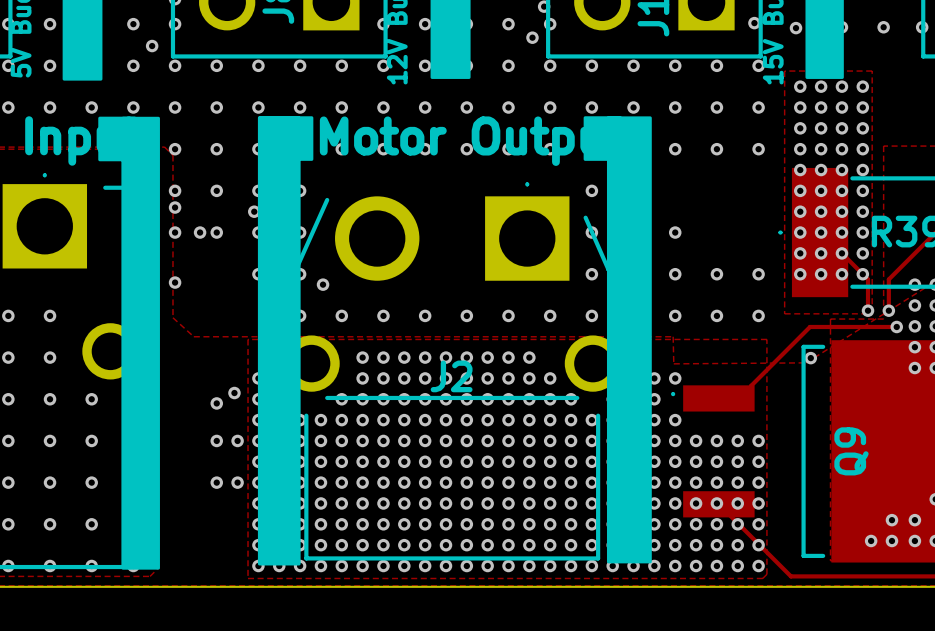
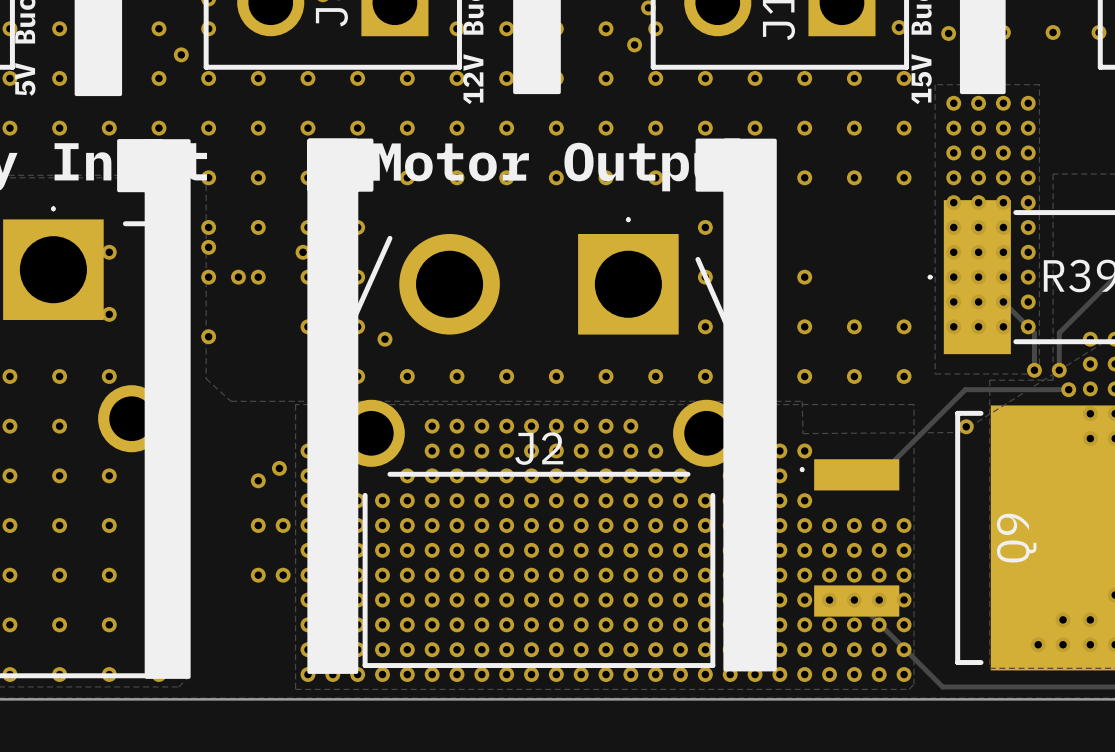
via: none -> (109, 252)
via: none -> (109, 314)
via: none -> (109, 376)

